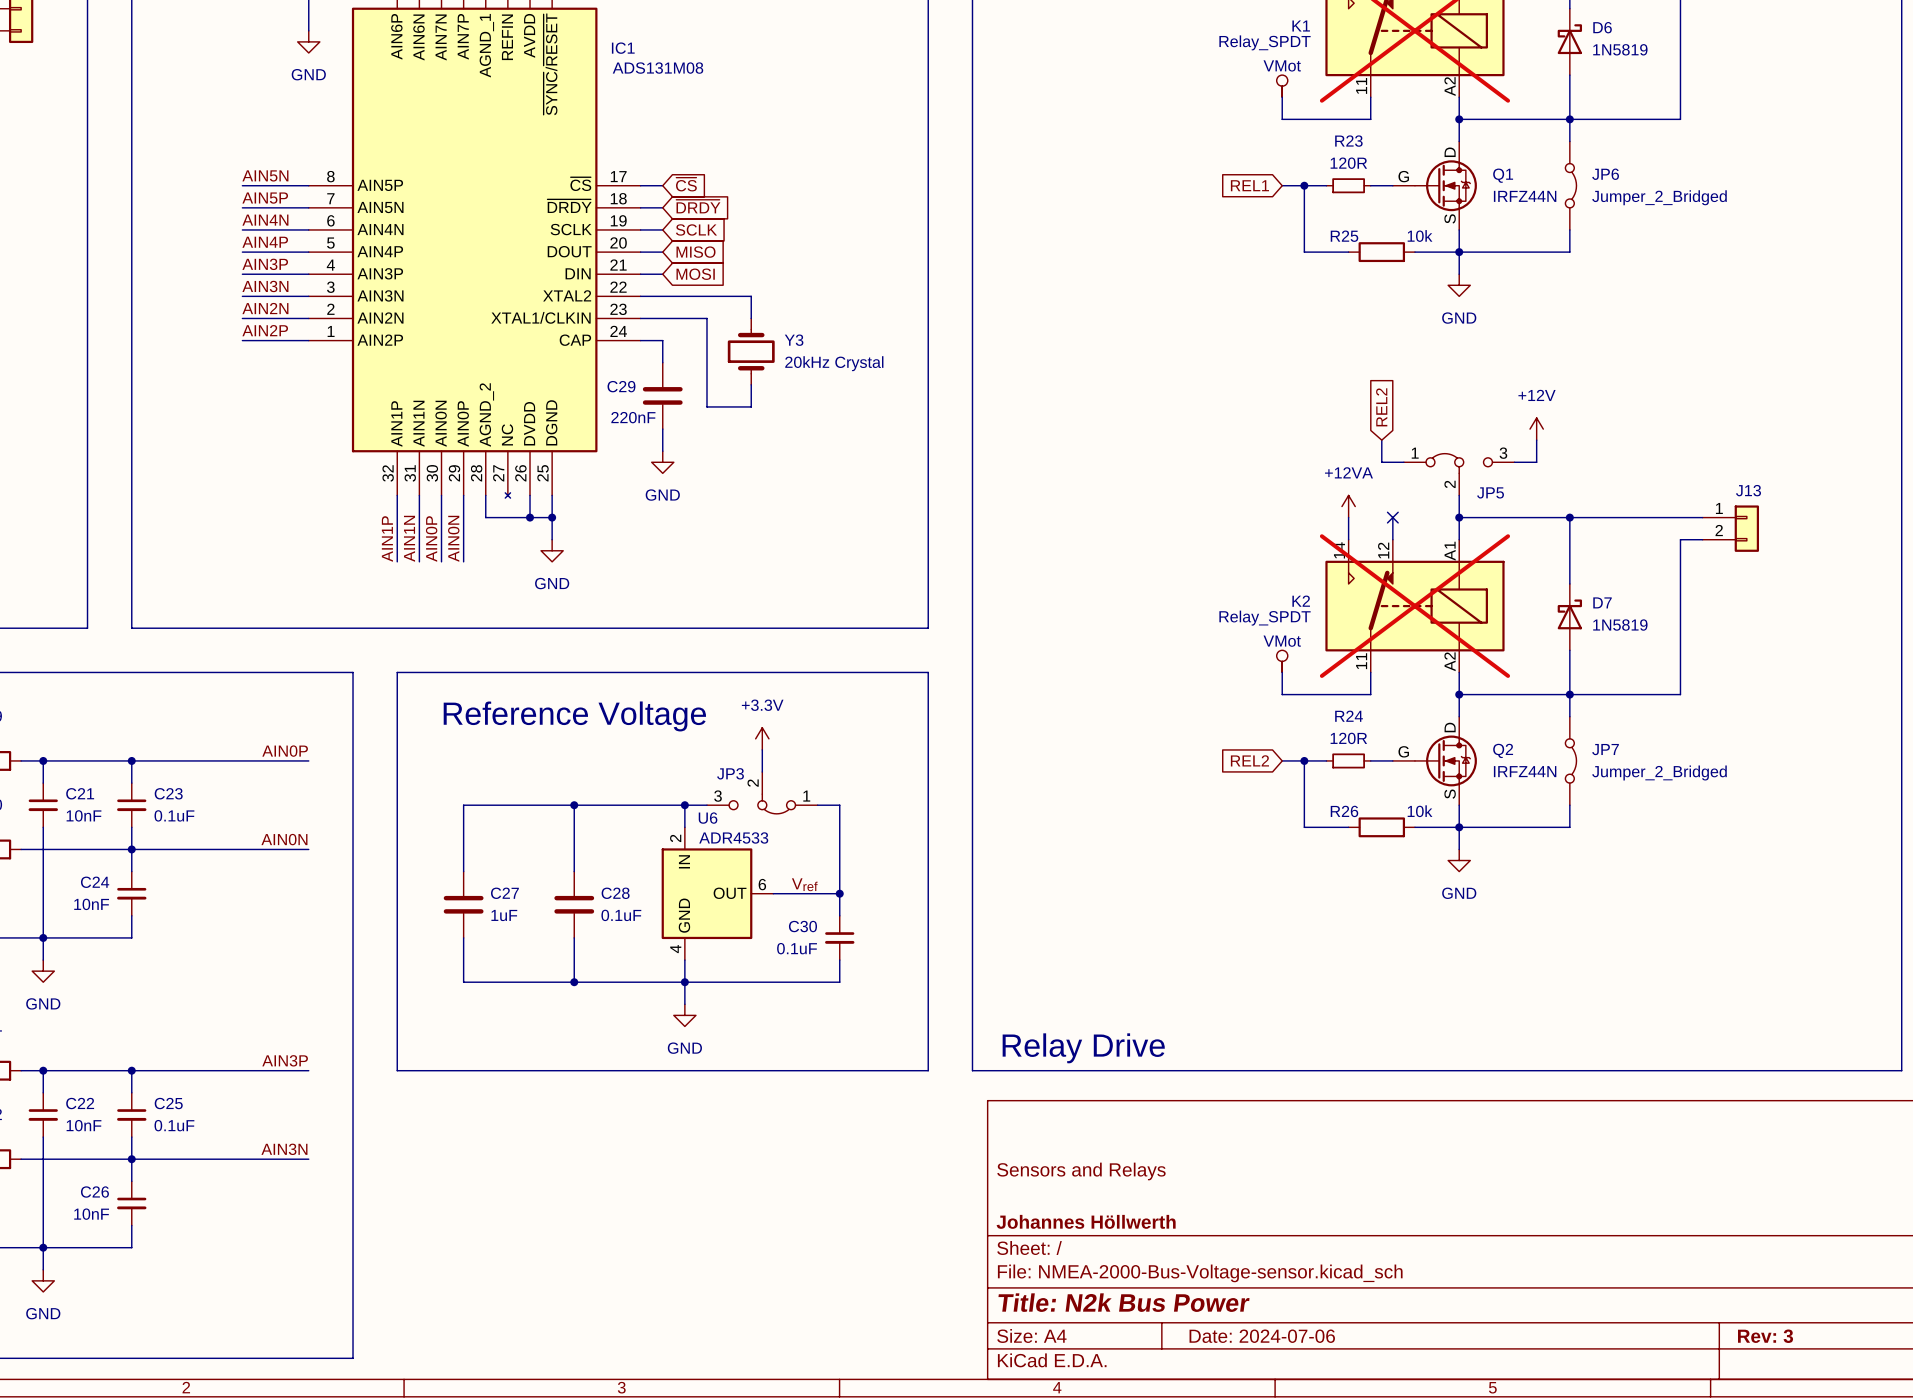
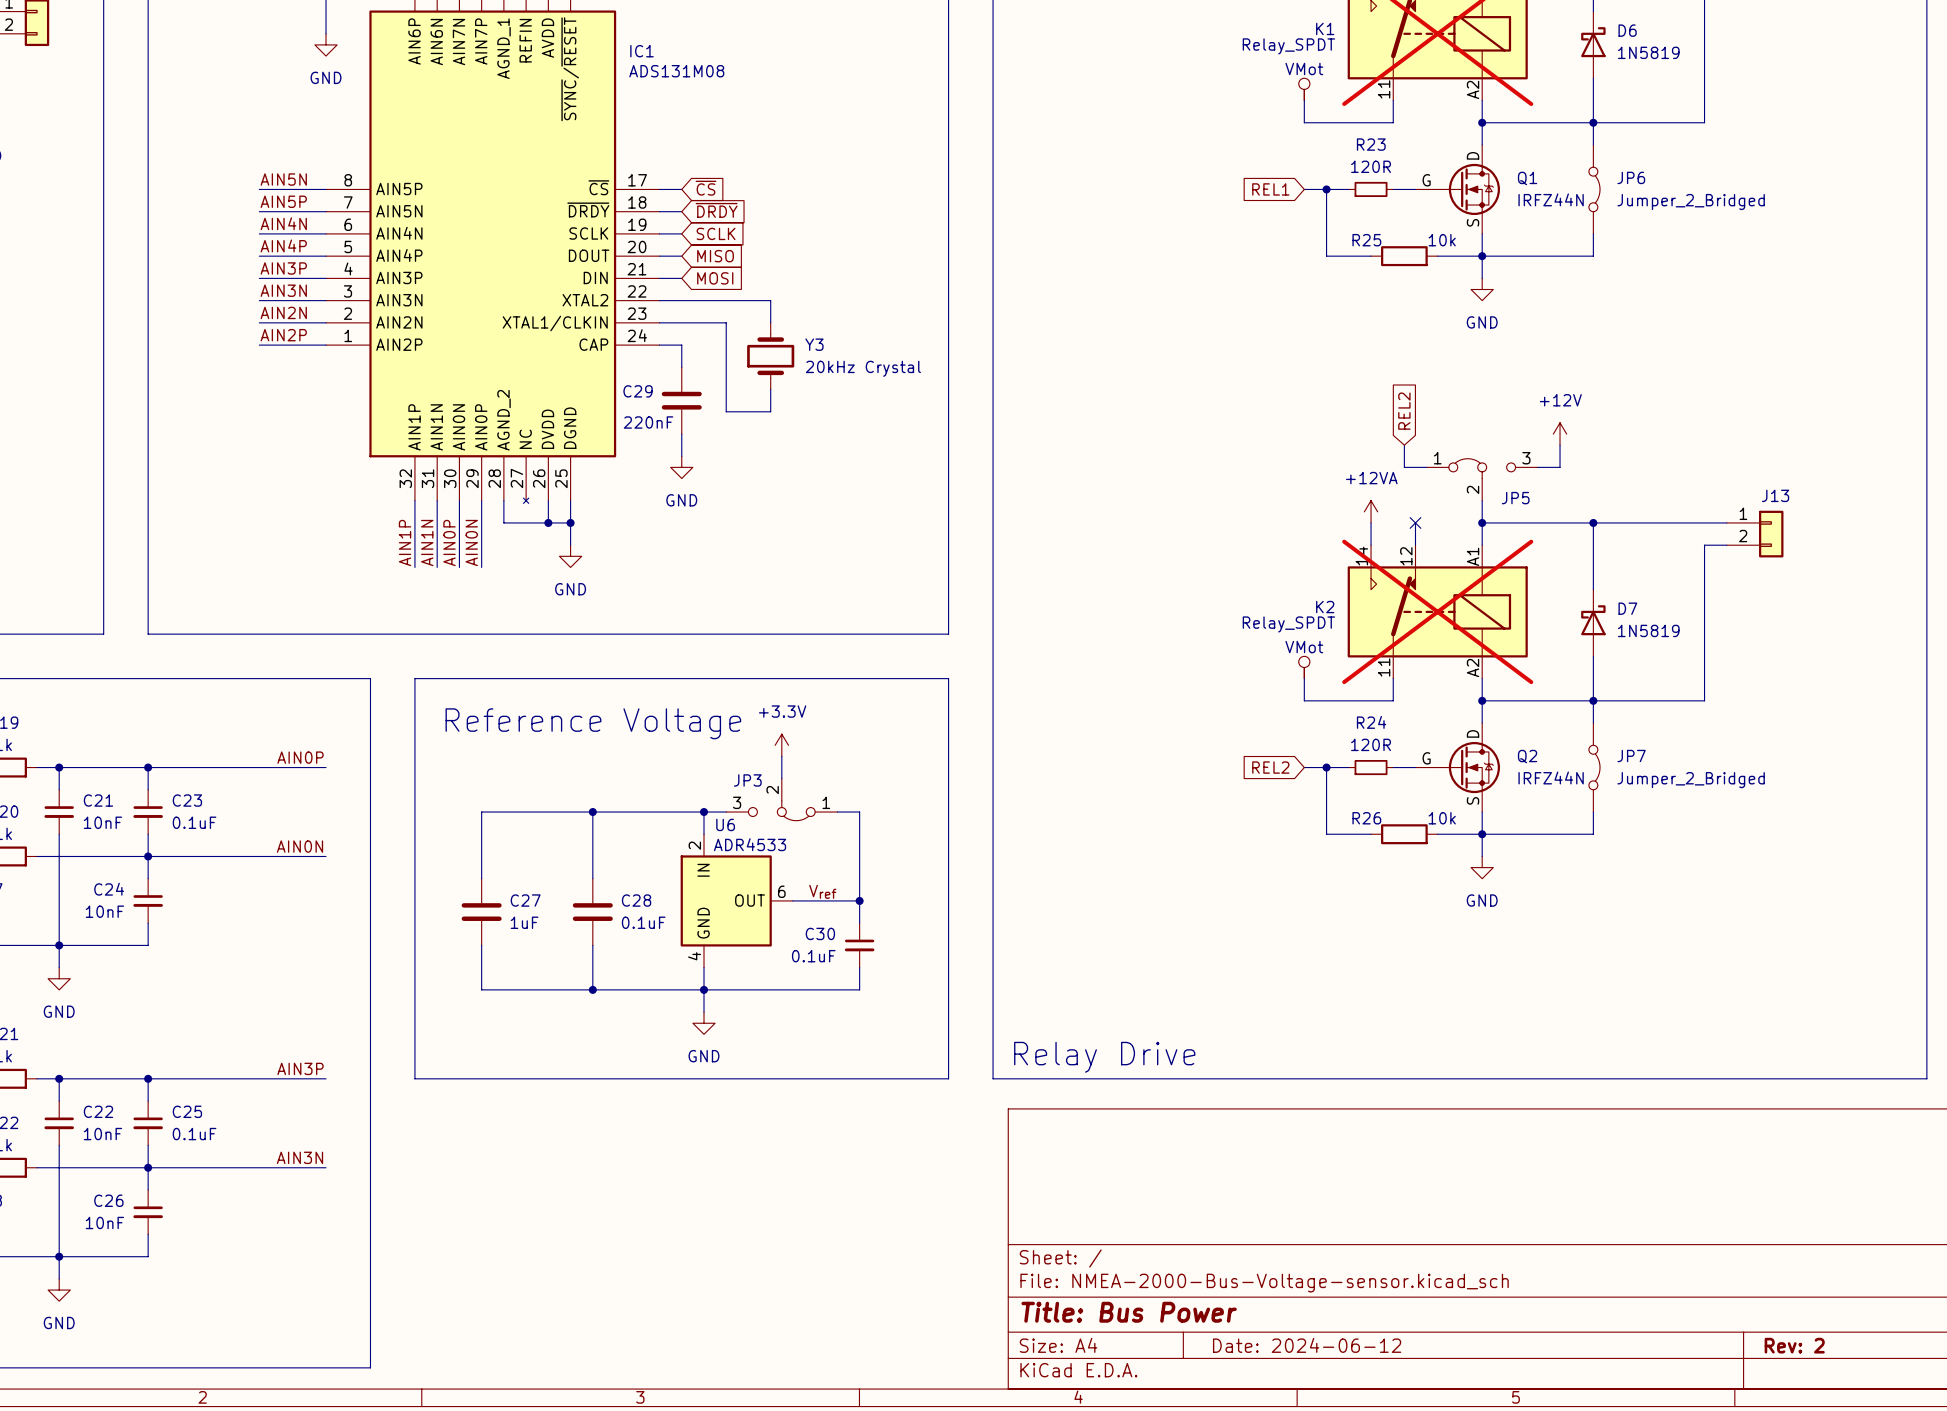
title block: Sensors and Relays (1081, 1171) -> none
title block: Johannes Höllwerth (1086, 1221) -> none
title block: Title: N2k Bus Power (1124, 1302) -> Title: Bus Power (1129, 1312)
title block: Date: 2024-07-06 (1262, 1336) -> Date: 2024-06-12 (1307, 1345)
title block: Rev: 3 (1765, 1336) -> Rev: 2 (1794, 1345)

